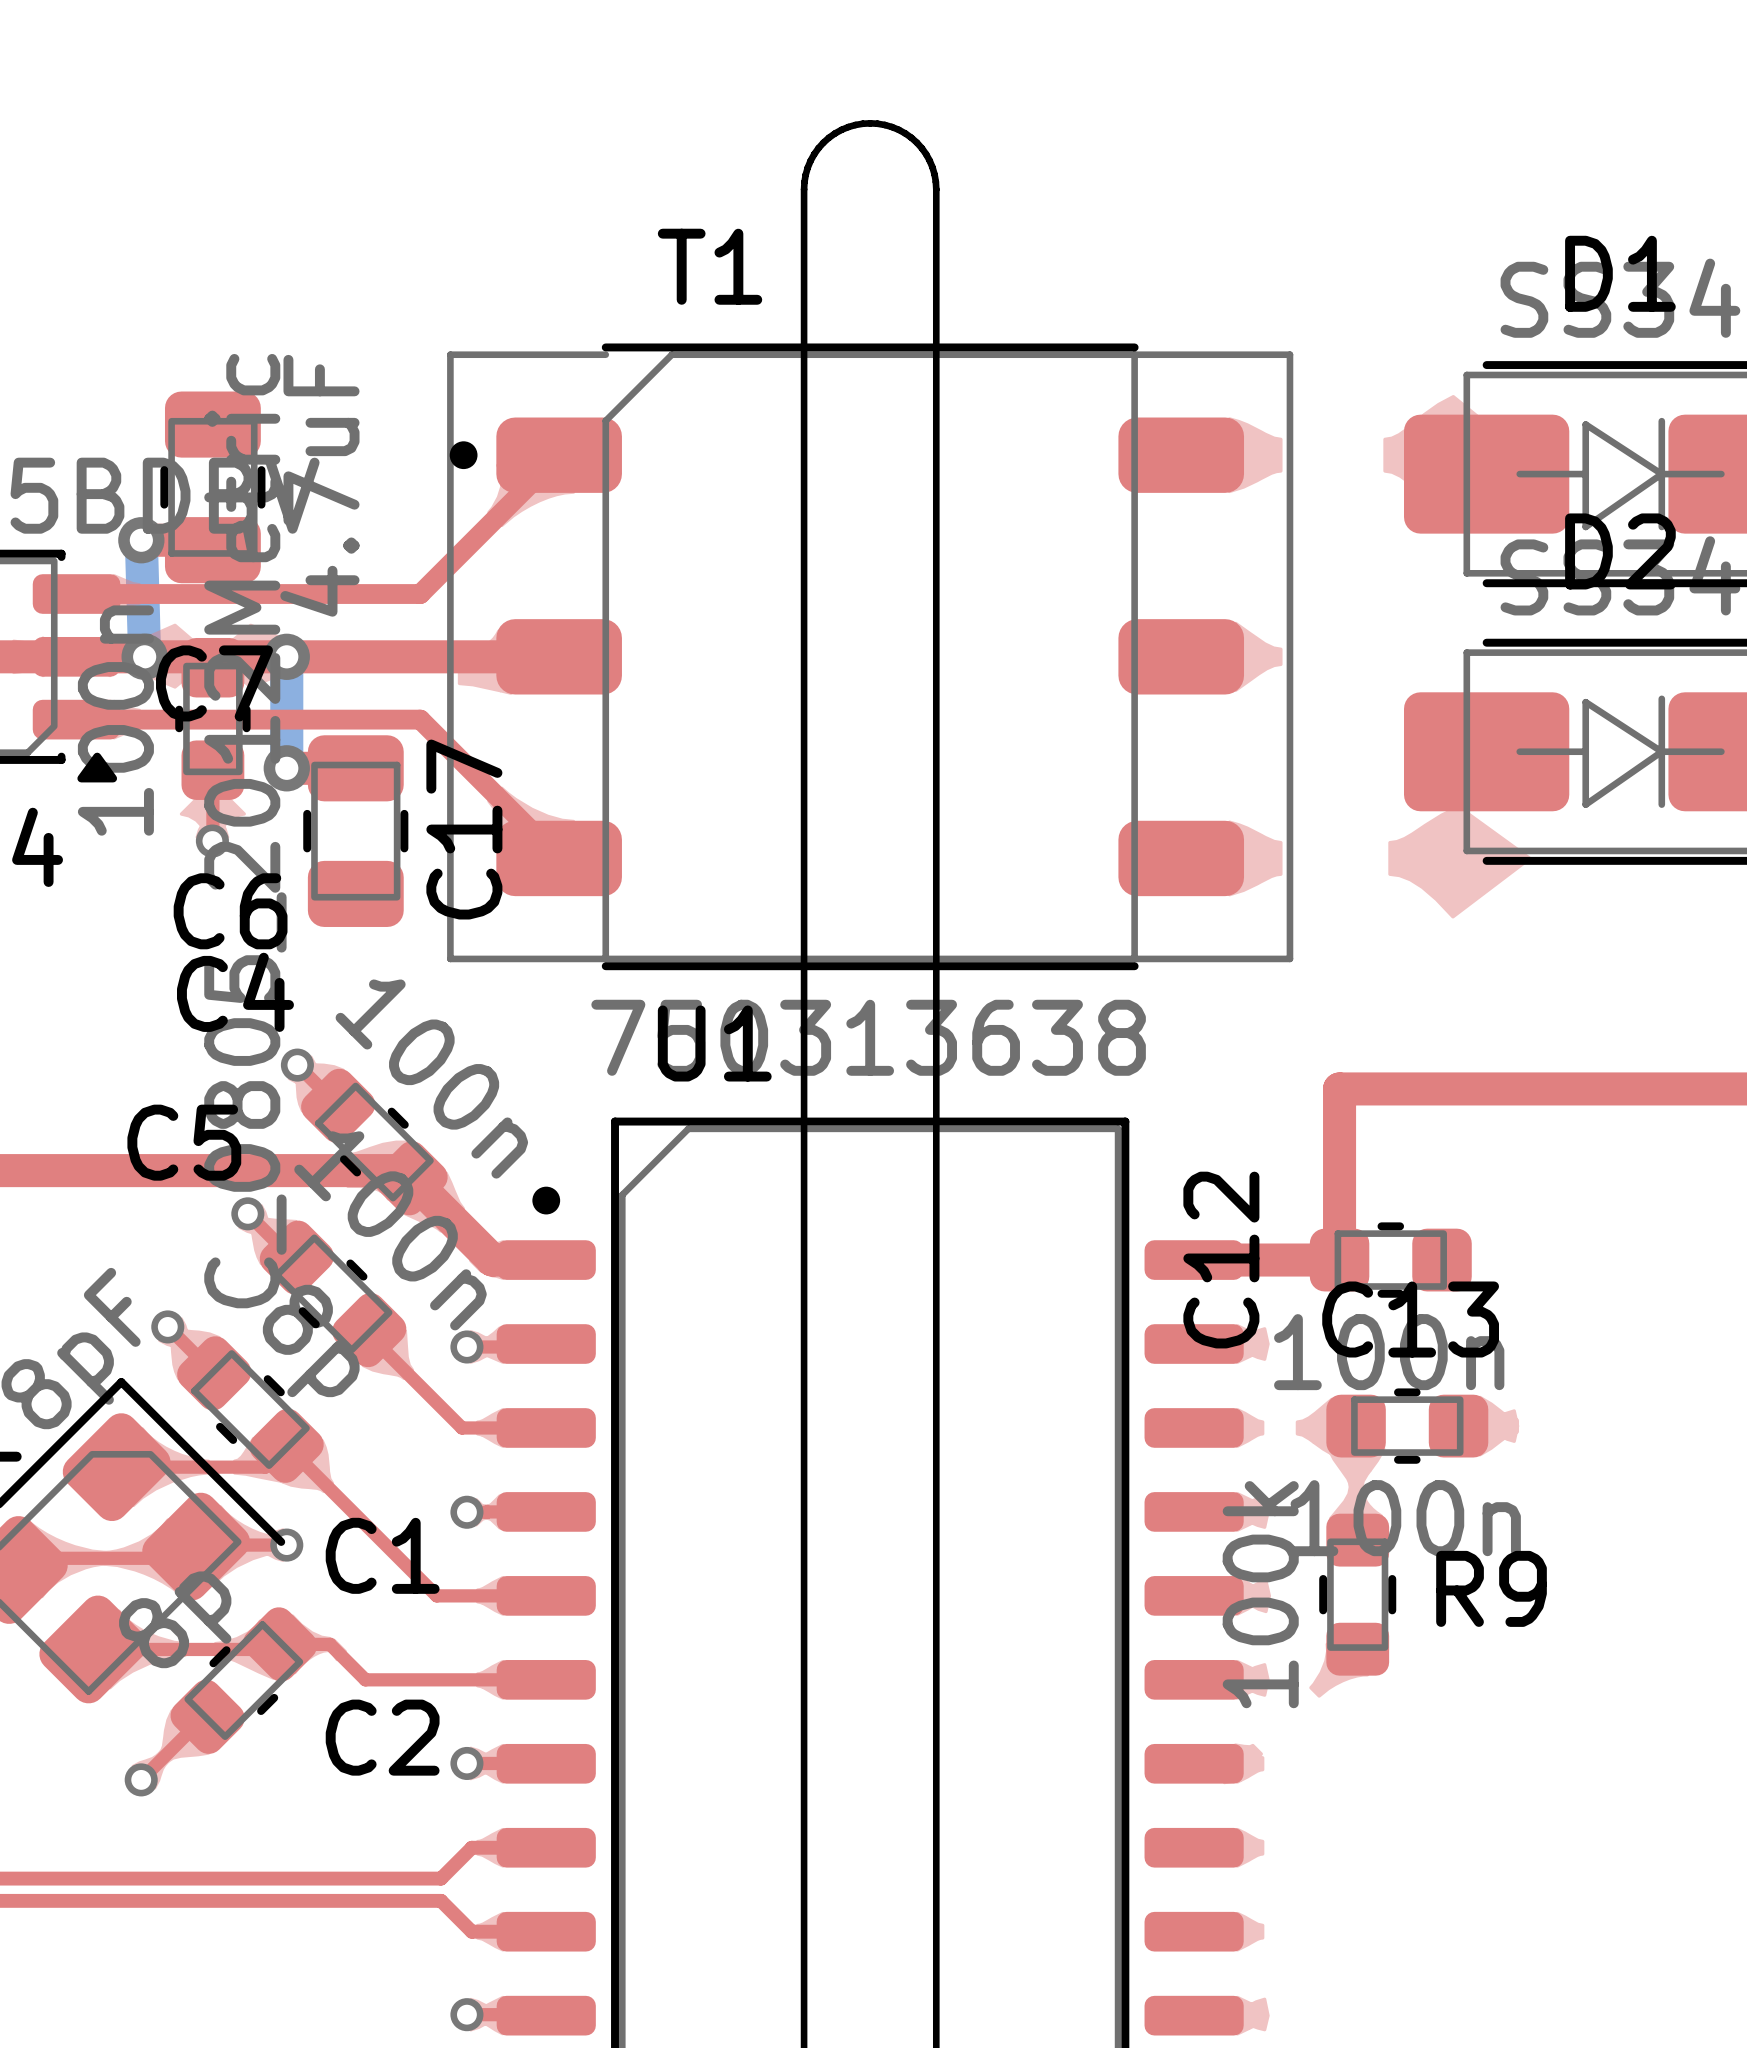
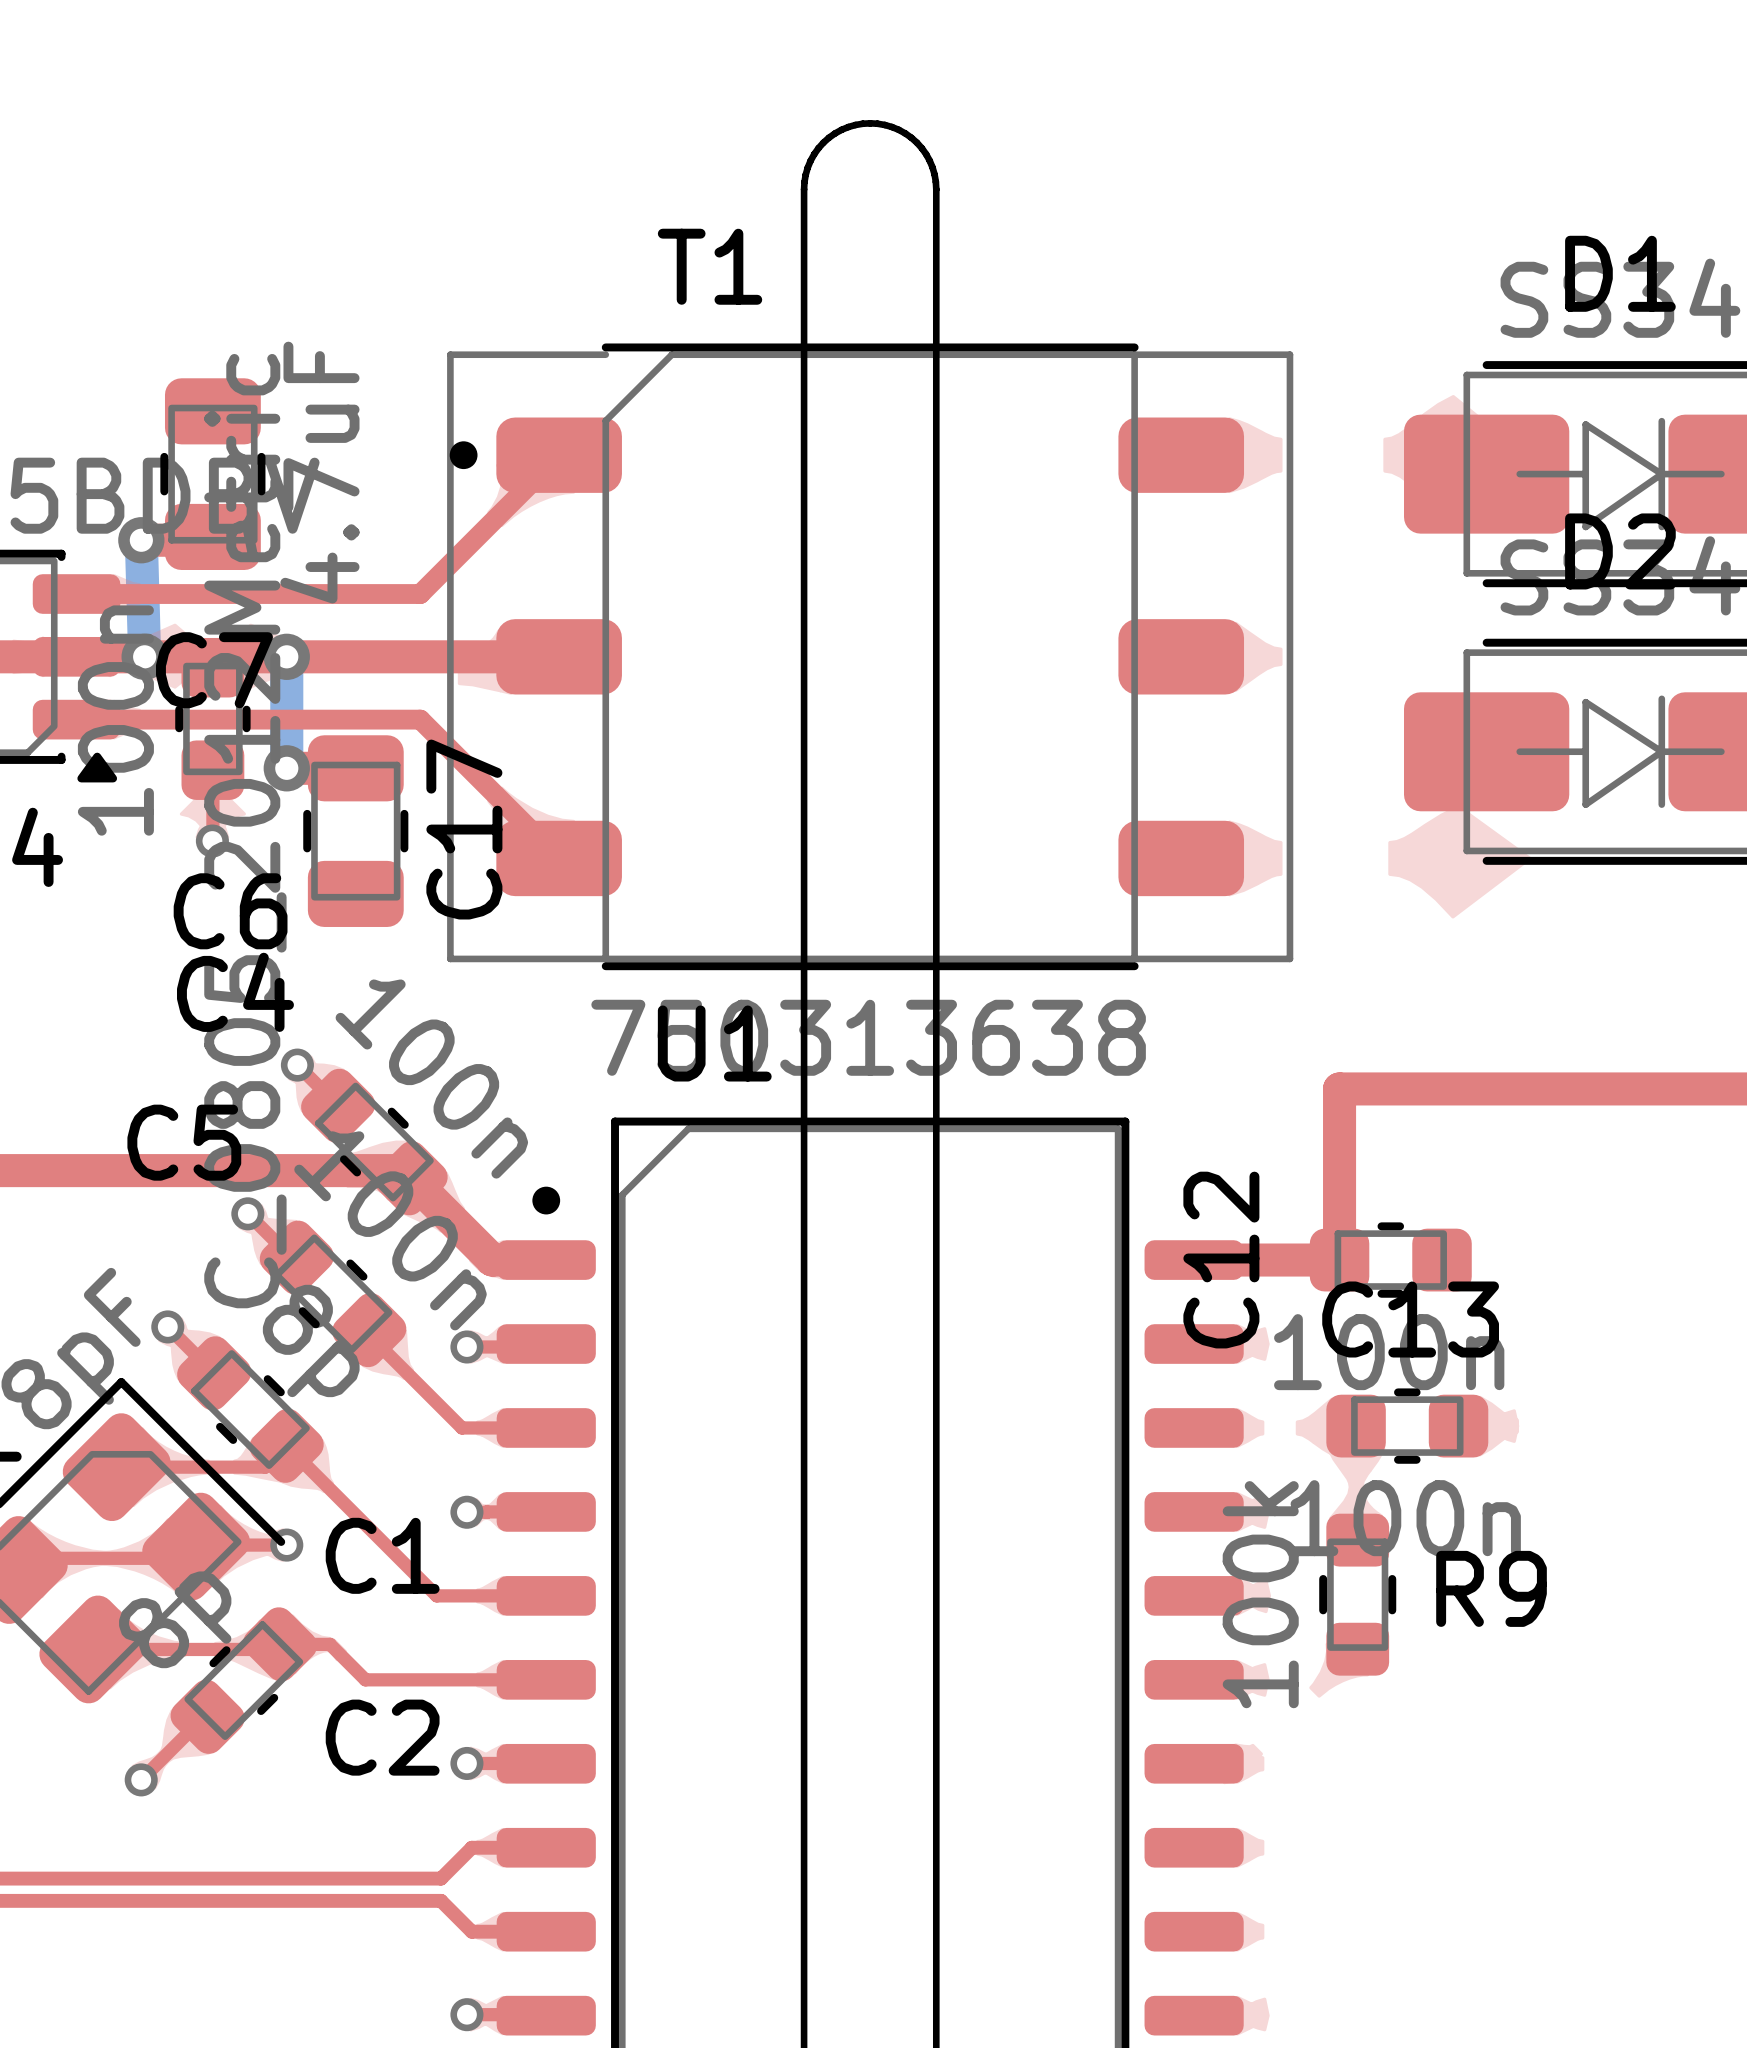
C7 position: (212, 487) -> (212, 474)

